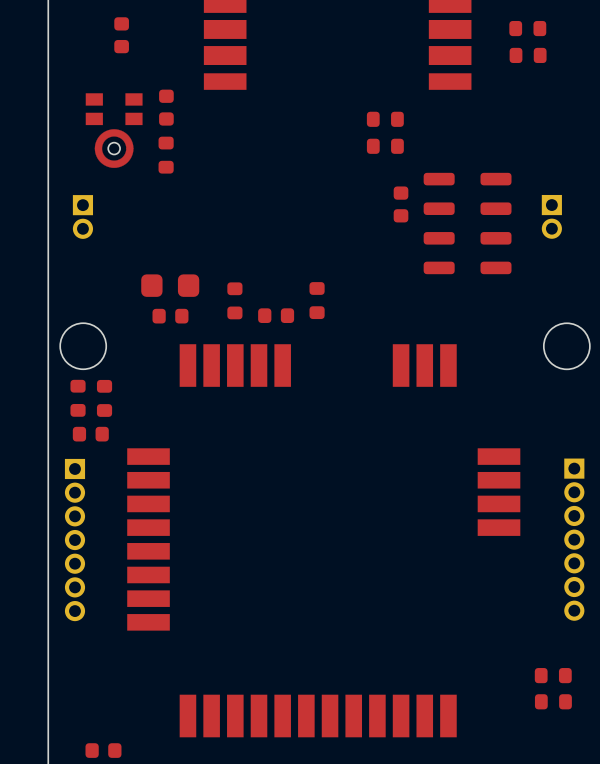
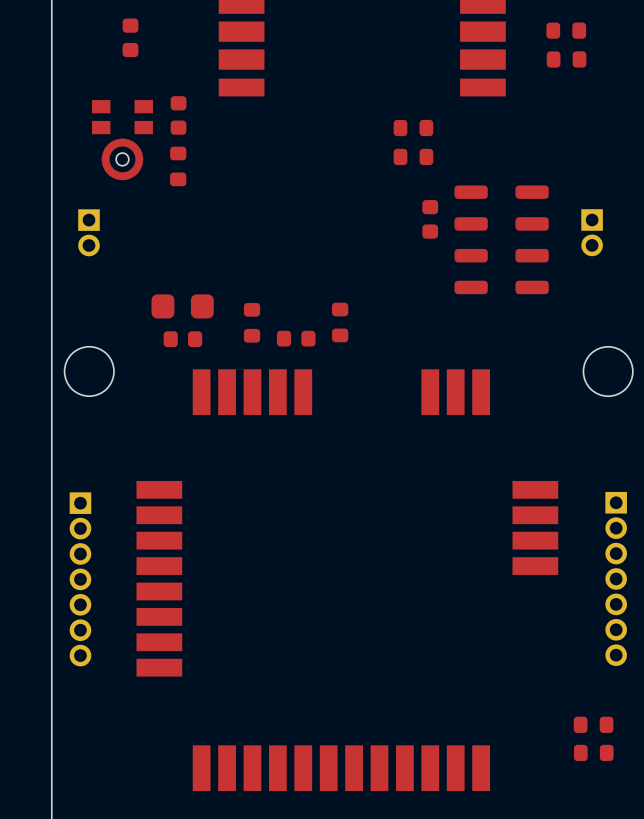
part: (78, 398) -> none
part: (104, 398) -> none
part: (90, 434) -> none
part: (103, 750) -> none

